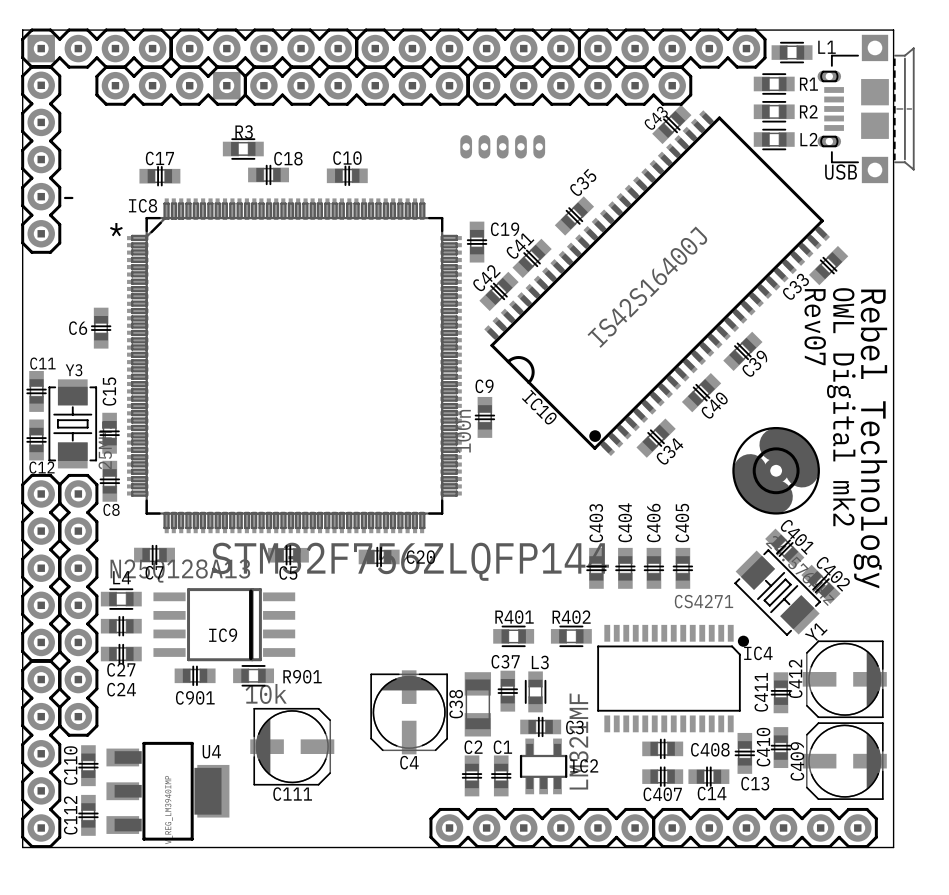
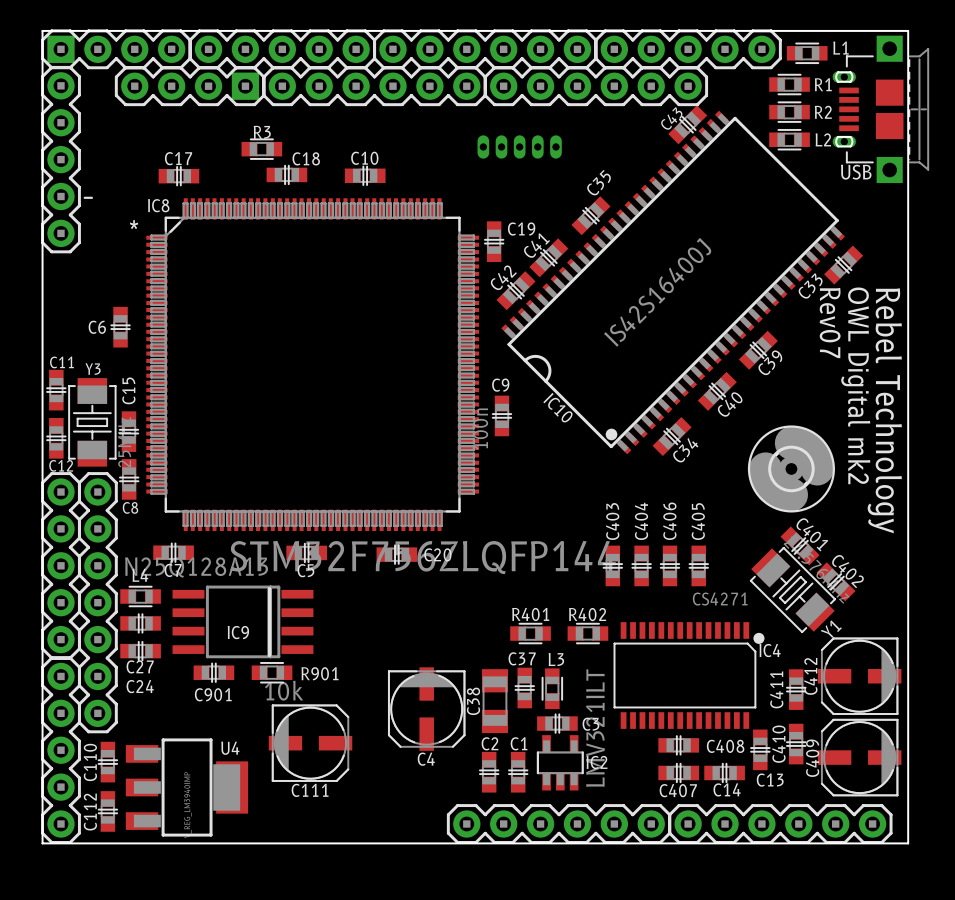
IC2 value: LM321MF (578, 741) -> LMV321ILT (595, 728)

